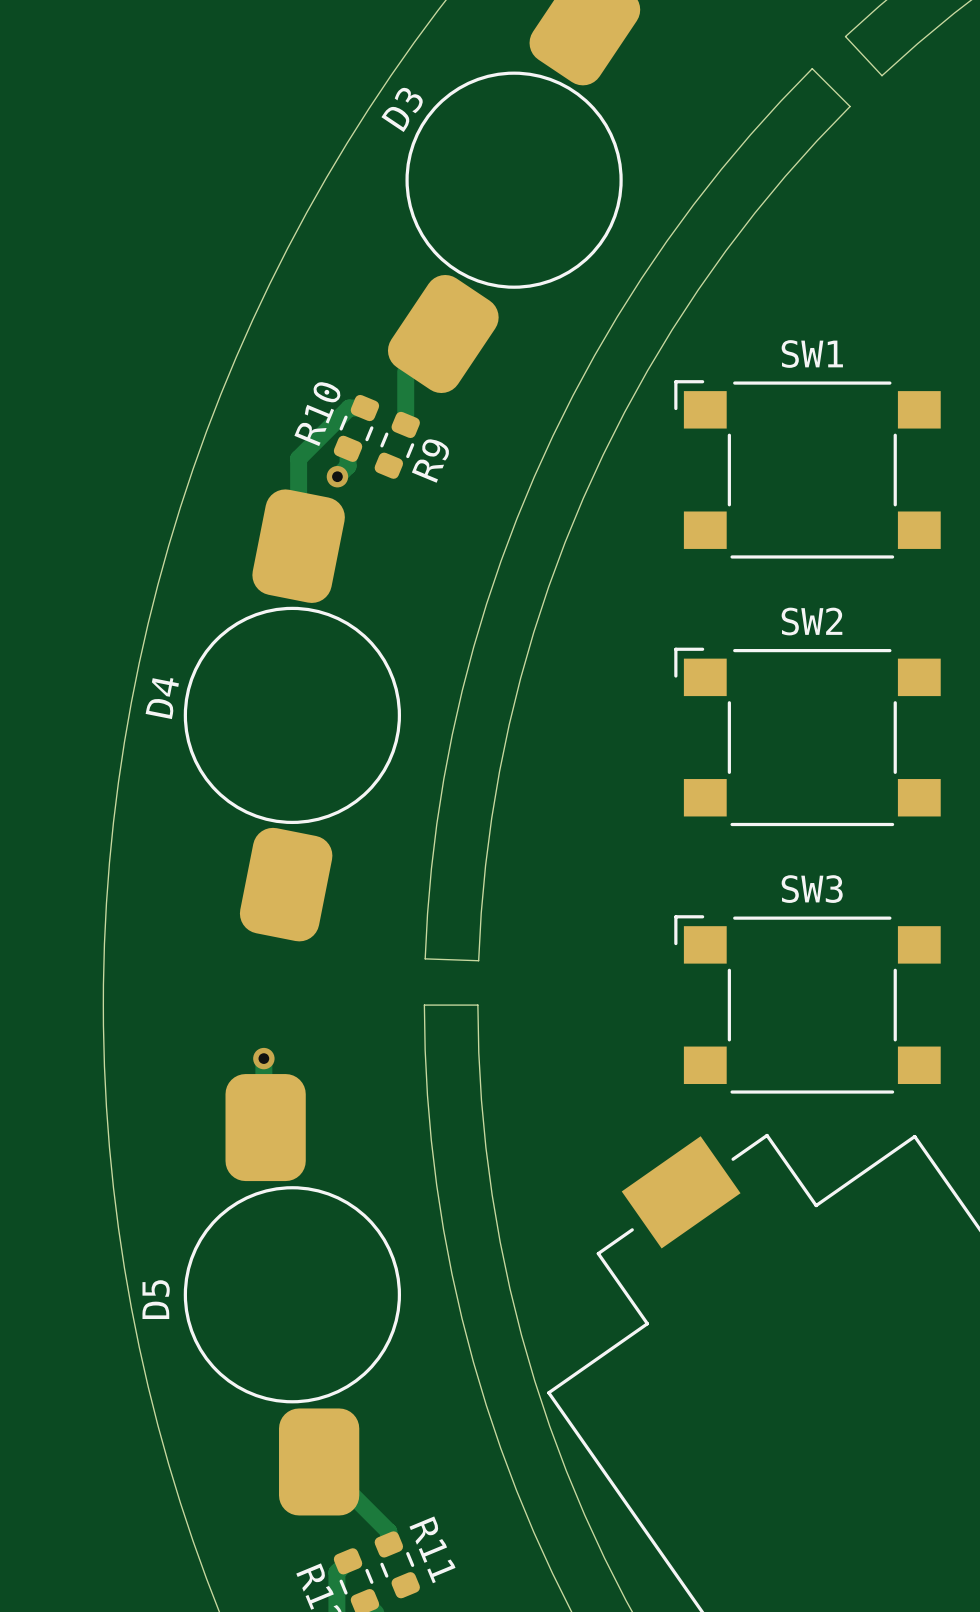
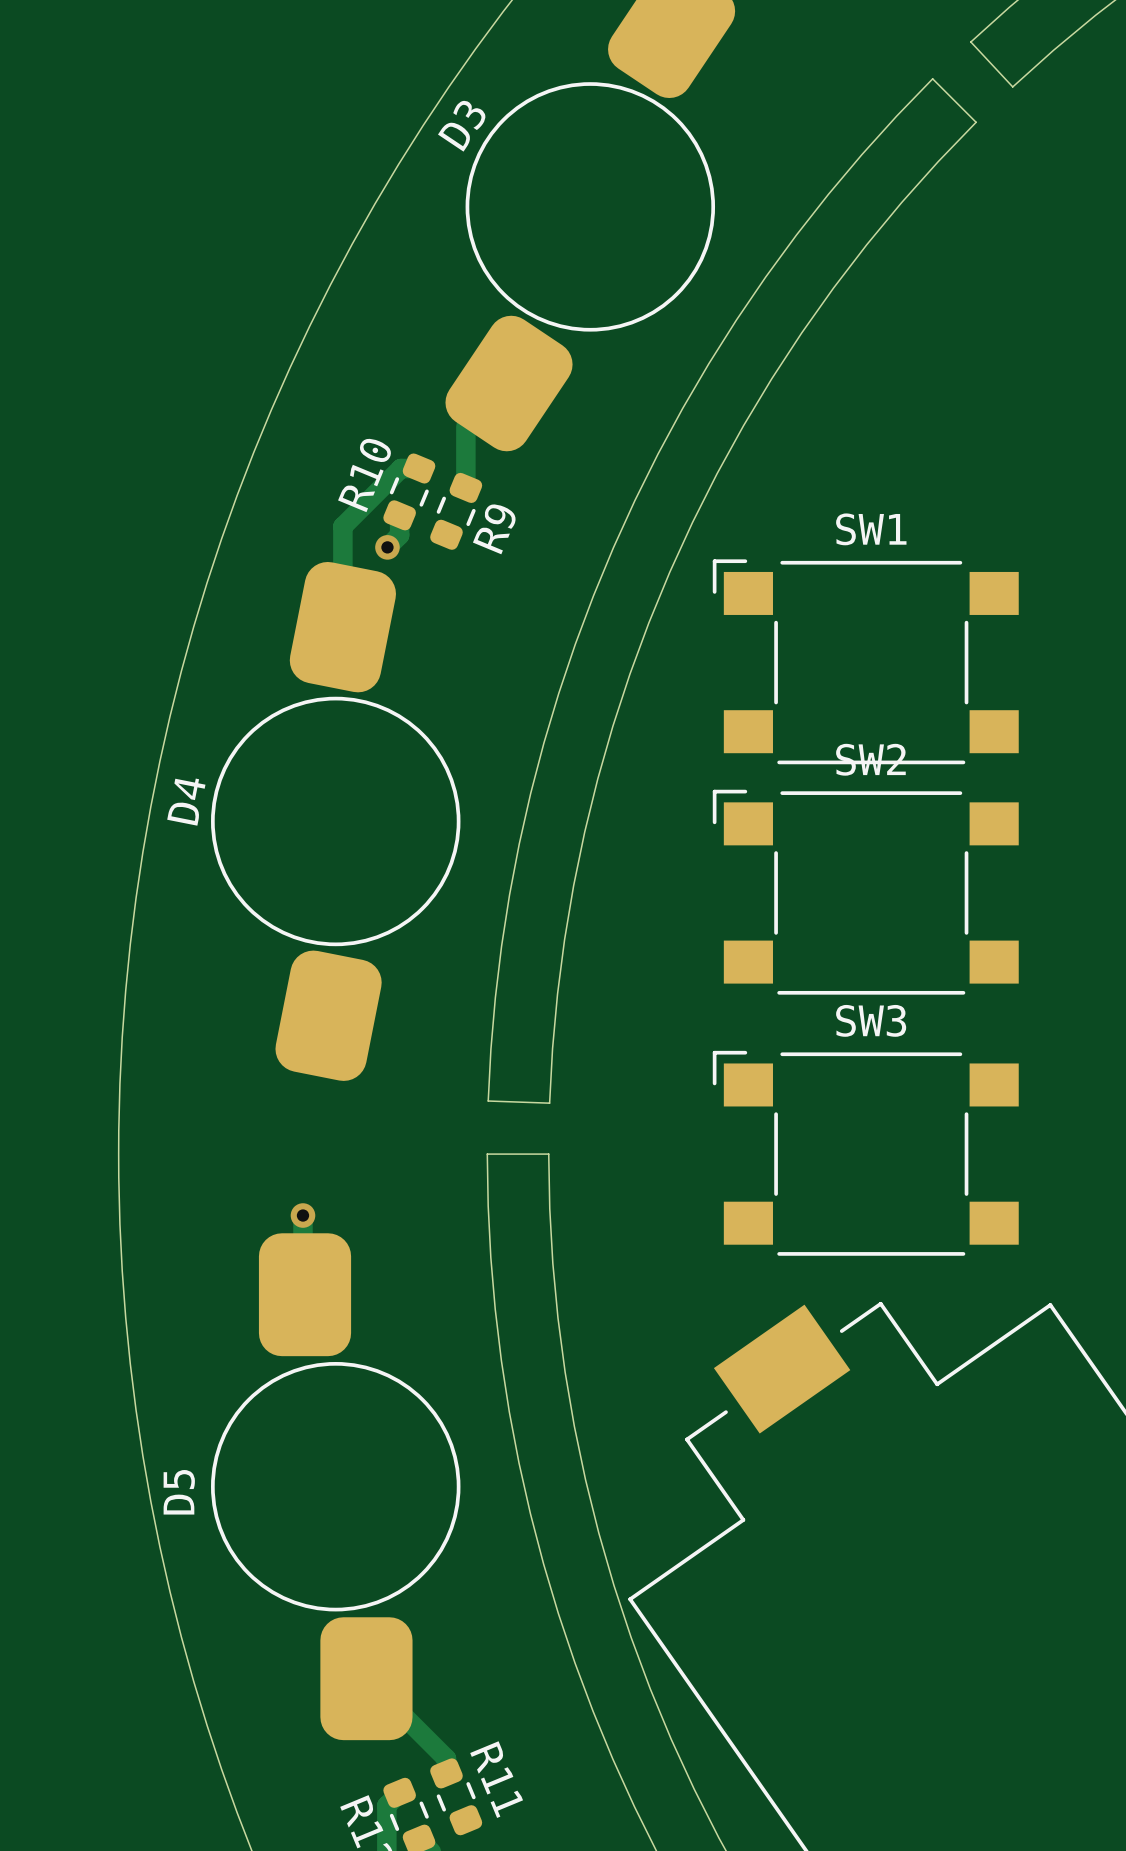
SW1 position: (807, 469) -> (865, 661)
SW2 position: (807, 736) -> (865, 892)
SW3 position: (807, 1004) -> (865, 1153)

